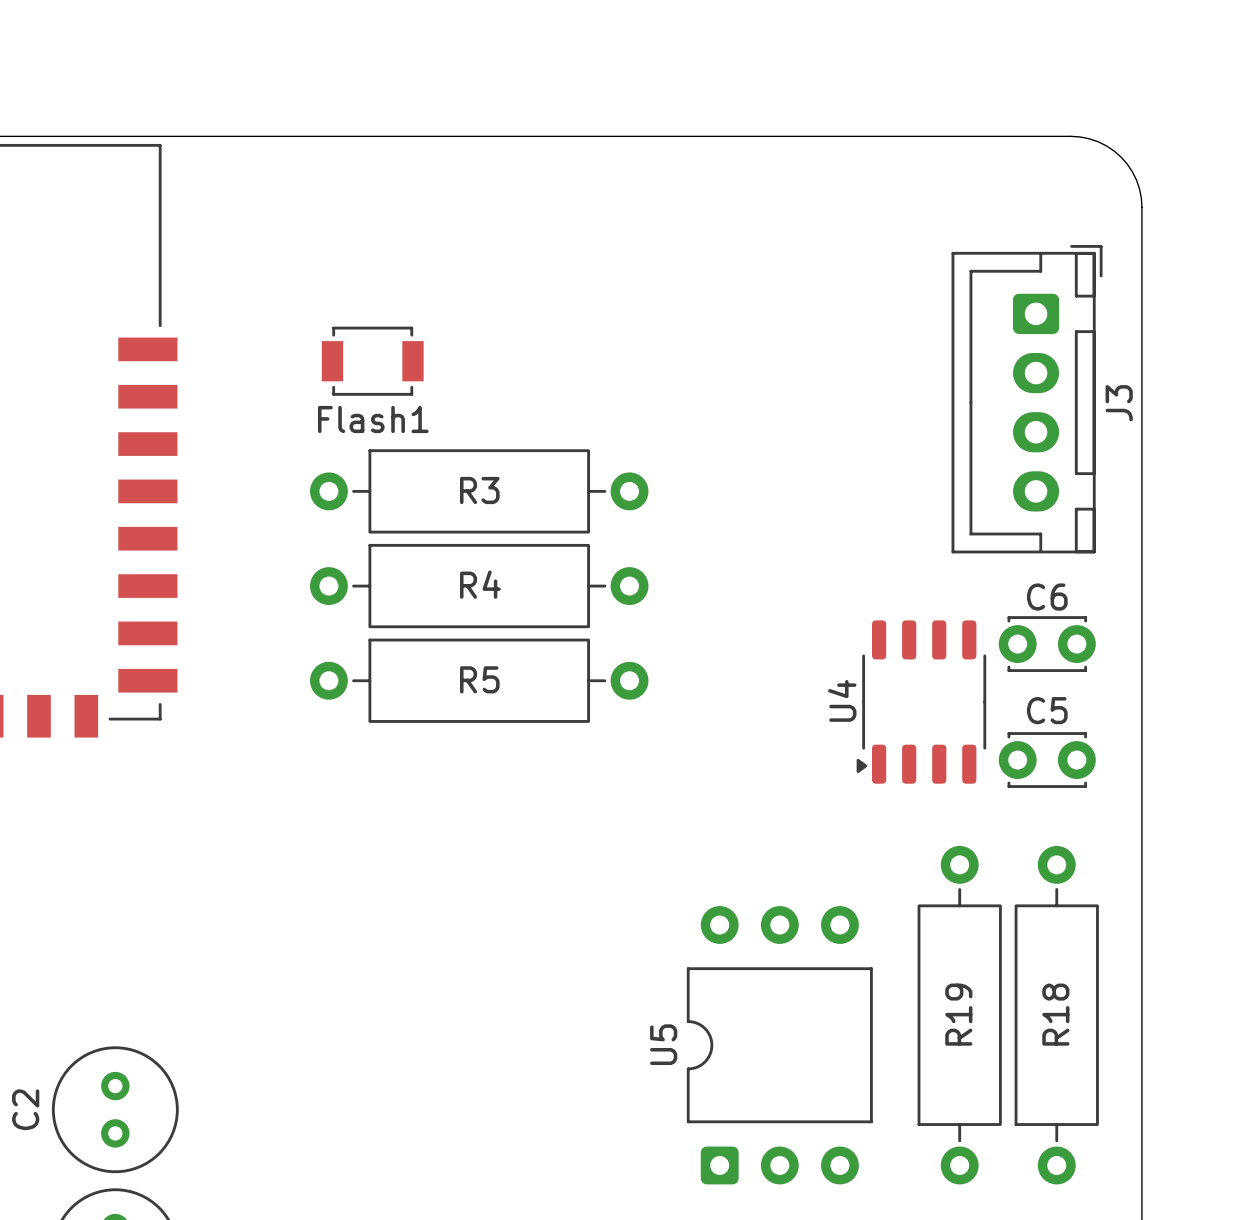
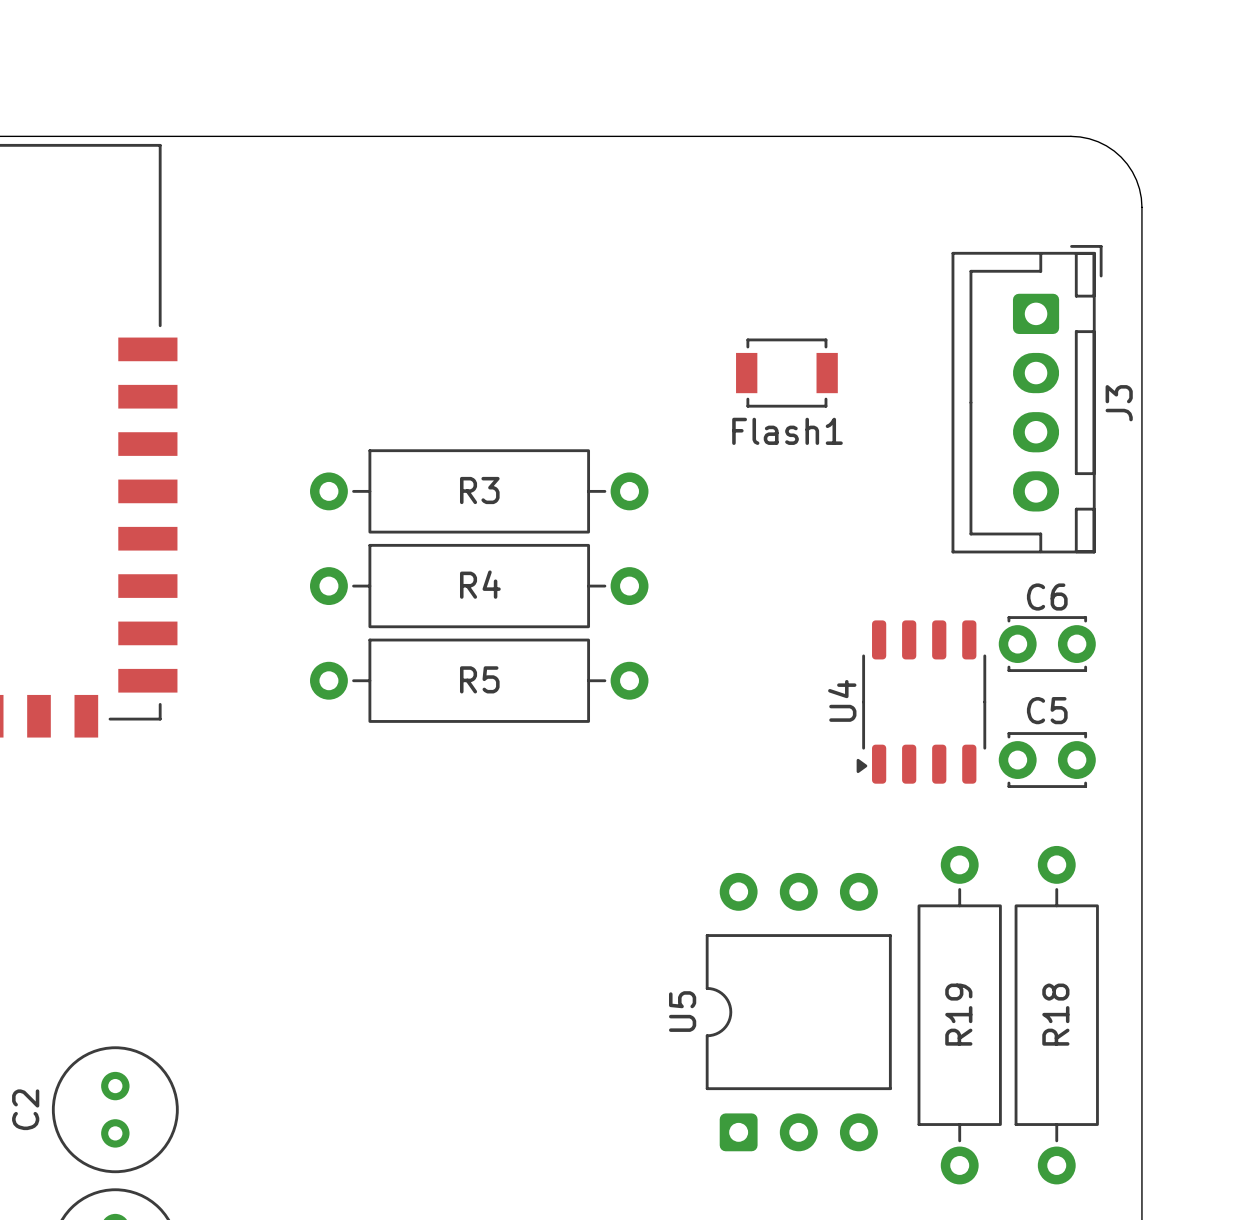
Flash1 position: (372, 361) -> (786, 373)
U5 position: (779, 1045) -> (798, 1012)

